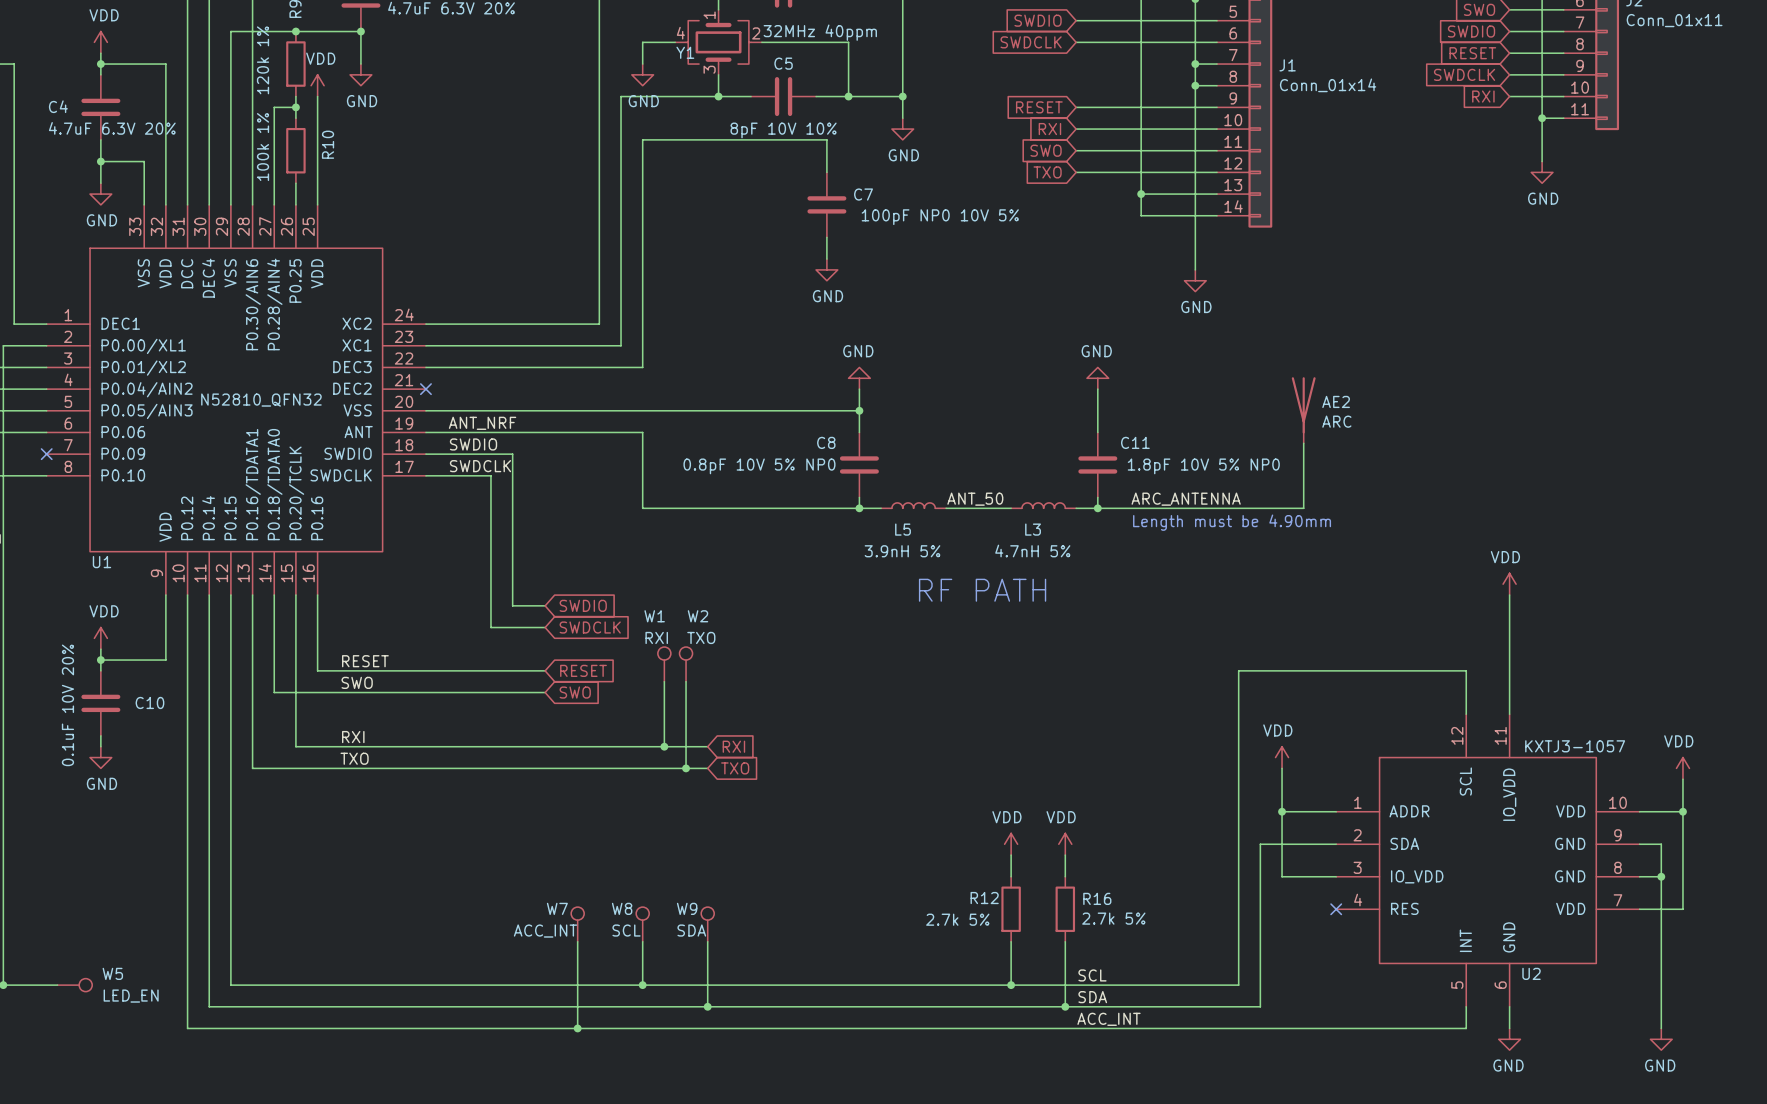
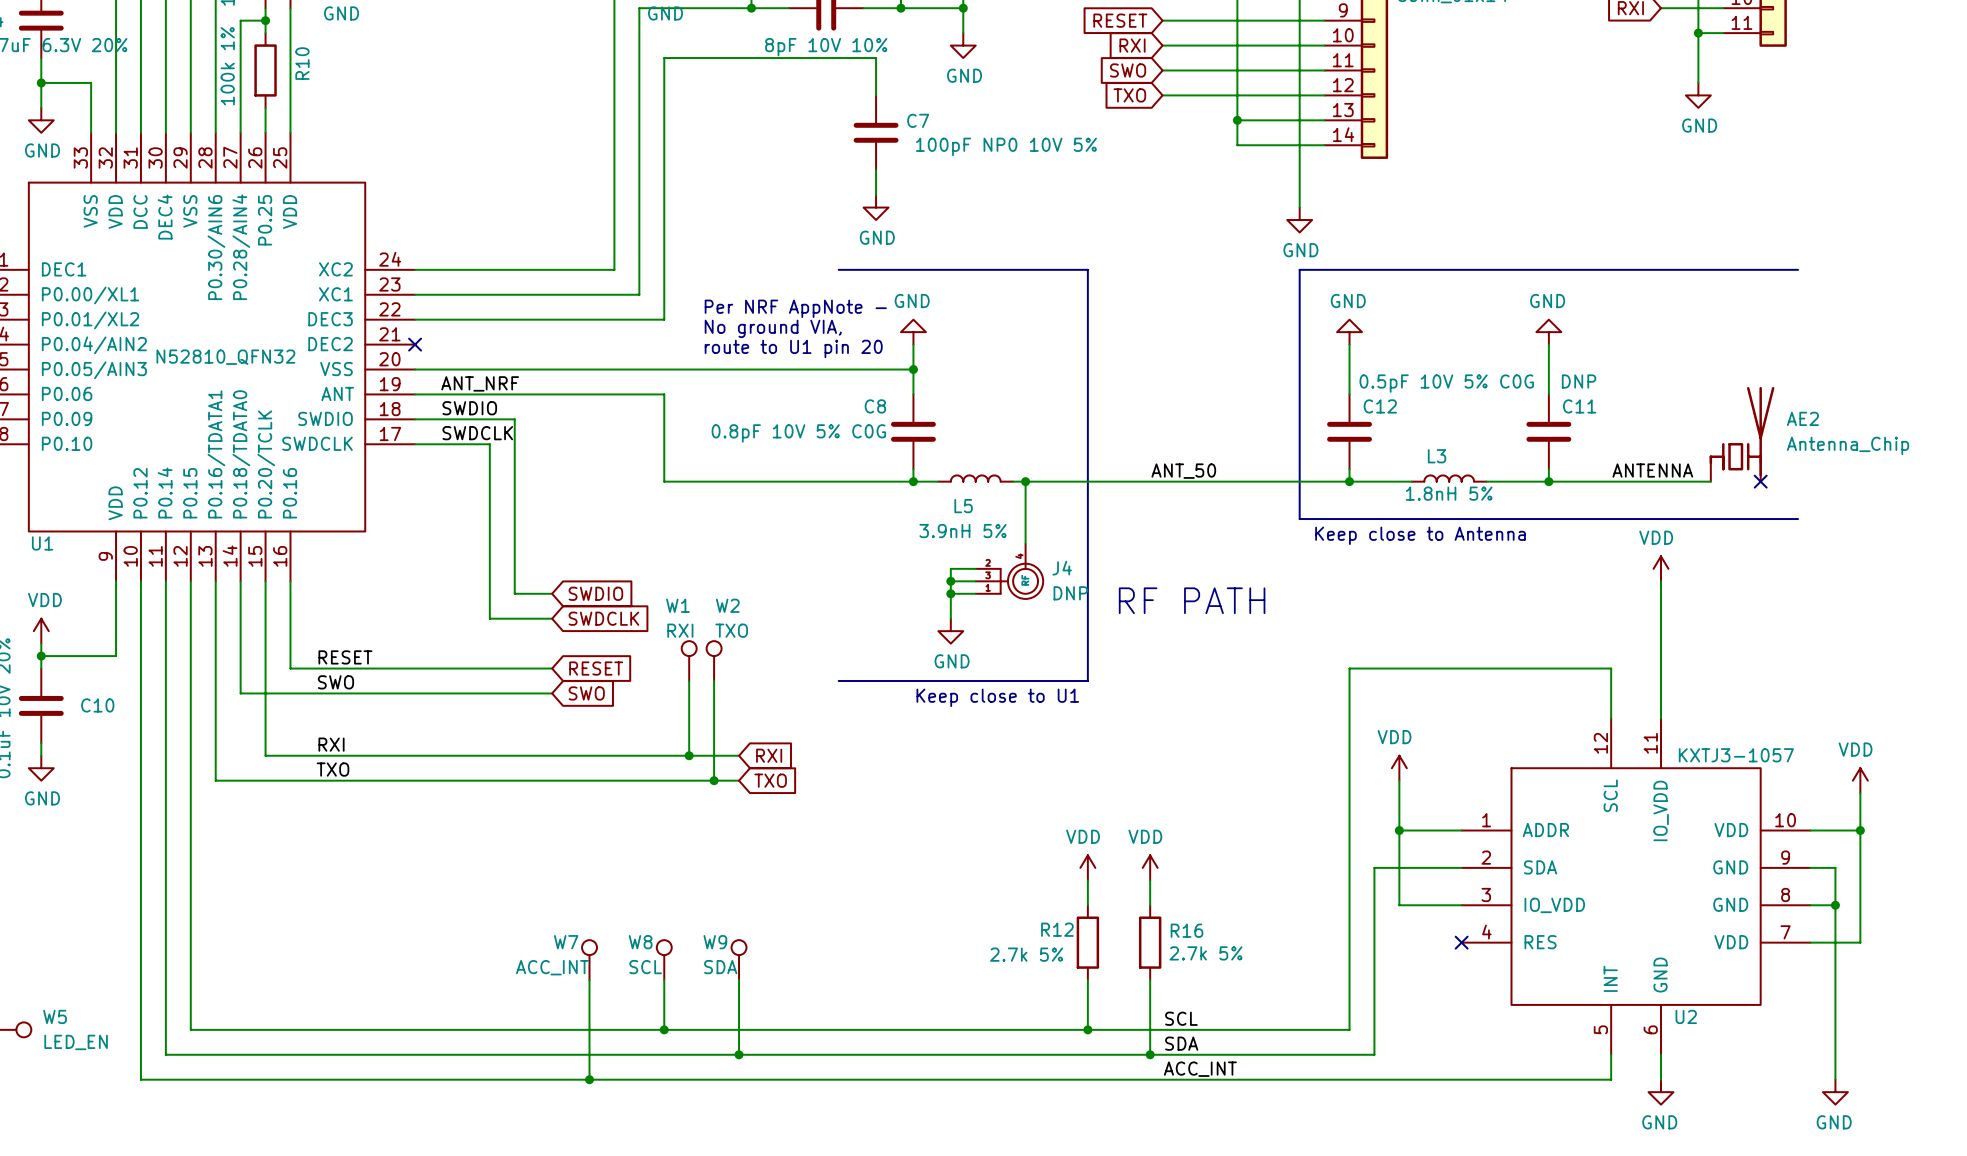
line: none -> (838, 269) (1087, 269) (1087, 681) (838, 681)
line: none -> (1798, 269) (1299, 269) (1299, 519) (1798, 519)
text: none -> Per NRF AppNote - (795, 308)
text: none -> No ground VIA, (773, 328)
AE2 symbol: [1291, 377, 1316, 444] -> [1709, 386, 1775, 482]
power symbol position: GND (1097, 378) -> GND (1349, 332)
power symbol: none -> GND (1548, 332)
wire: (1097, 389) (1097, 432) -> (1349, 344) (1349, 394)
wire: none -> (1548, 344) (1548, 394)
text: none -> route to U1 pin 20 (793, 348)
AE2 name position: AE2 (1336, 401) -> AE2 (1802, 418)
AE2 value: ARC (1336, 421) -> Antenna_Chip (1847, 445)
C11 name position: C11 (1135, 442) -> C11 (1579, 406)
wire: (1303, 443) (1303, 508) (1292, 508) -> none
C11 position: (1097, 464) -> (1548, 431)
C12: none -> 0.5pF 10V 5% C0G (1349, 431)
C8 value: 0.8pF 10V 5% NP0 (759, 466) -> 0.8pF 10V 5% C0G (798, 433)
C11 value: 1.8pF 10V 5% NP0 (1203, 466) -> DNP (1579, 381)
wire: none -> (1548, 469) (1548, 481)
label: none -> ANTENNA (1652, 470)
label position: ANT_50 (975, 499) -> ANT_50 (1183, 471)
label: ARC_ANTENNA (1186, 499) -> none
L3 position: (1043, 505) -> (1449, 478)
wire: none -> (1025, 481) (1025, 543)
junction: none -> (1025, 481)
wire: none -> (1087, 481) (1162, 481)
junction: (1097, 508) -> none
junction: none -> (1349, 481)
wire: none -> (1486, 481) (1710, 481)
junction: none -> (1548, 481)
no-connect mark: none -> (1760, 481)
text: Length must be 4.90mm (1232, 522) -> none
L3 name position: L3 (1033, 529) -> L3 (1437, 456)
L3 value: 4.7nH 5% (1032, 551) -> 1.8nH 5% (1449, 493)
text: none -> Keep close to Antenna (1420, 535)
wire: none -> (975, 568) (950, 568) (950, 618)
J4: none -> DNP (1009, 571)
text position: RF PATH (982, 590) -> RF PATH (1192, 600)
wire: none -> (950, 581) (975, 581)
junction: none -> (950, 581)
wire: none -> (950, 593) (975, 593)
junction: none -> (950, 593)
power symbol: none -> GND (950, 631)
text: none -> Keep close to U1 (997, 697)

